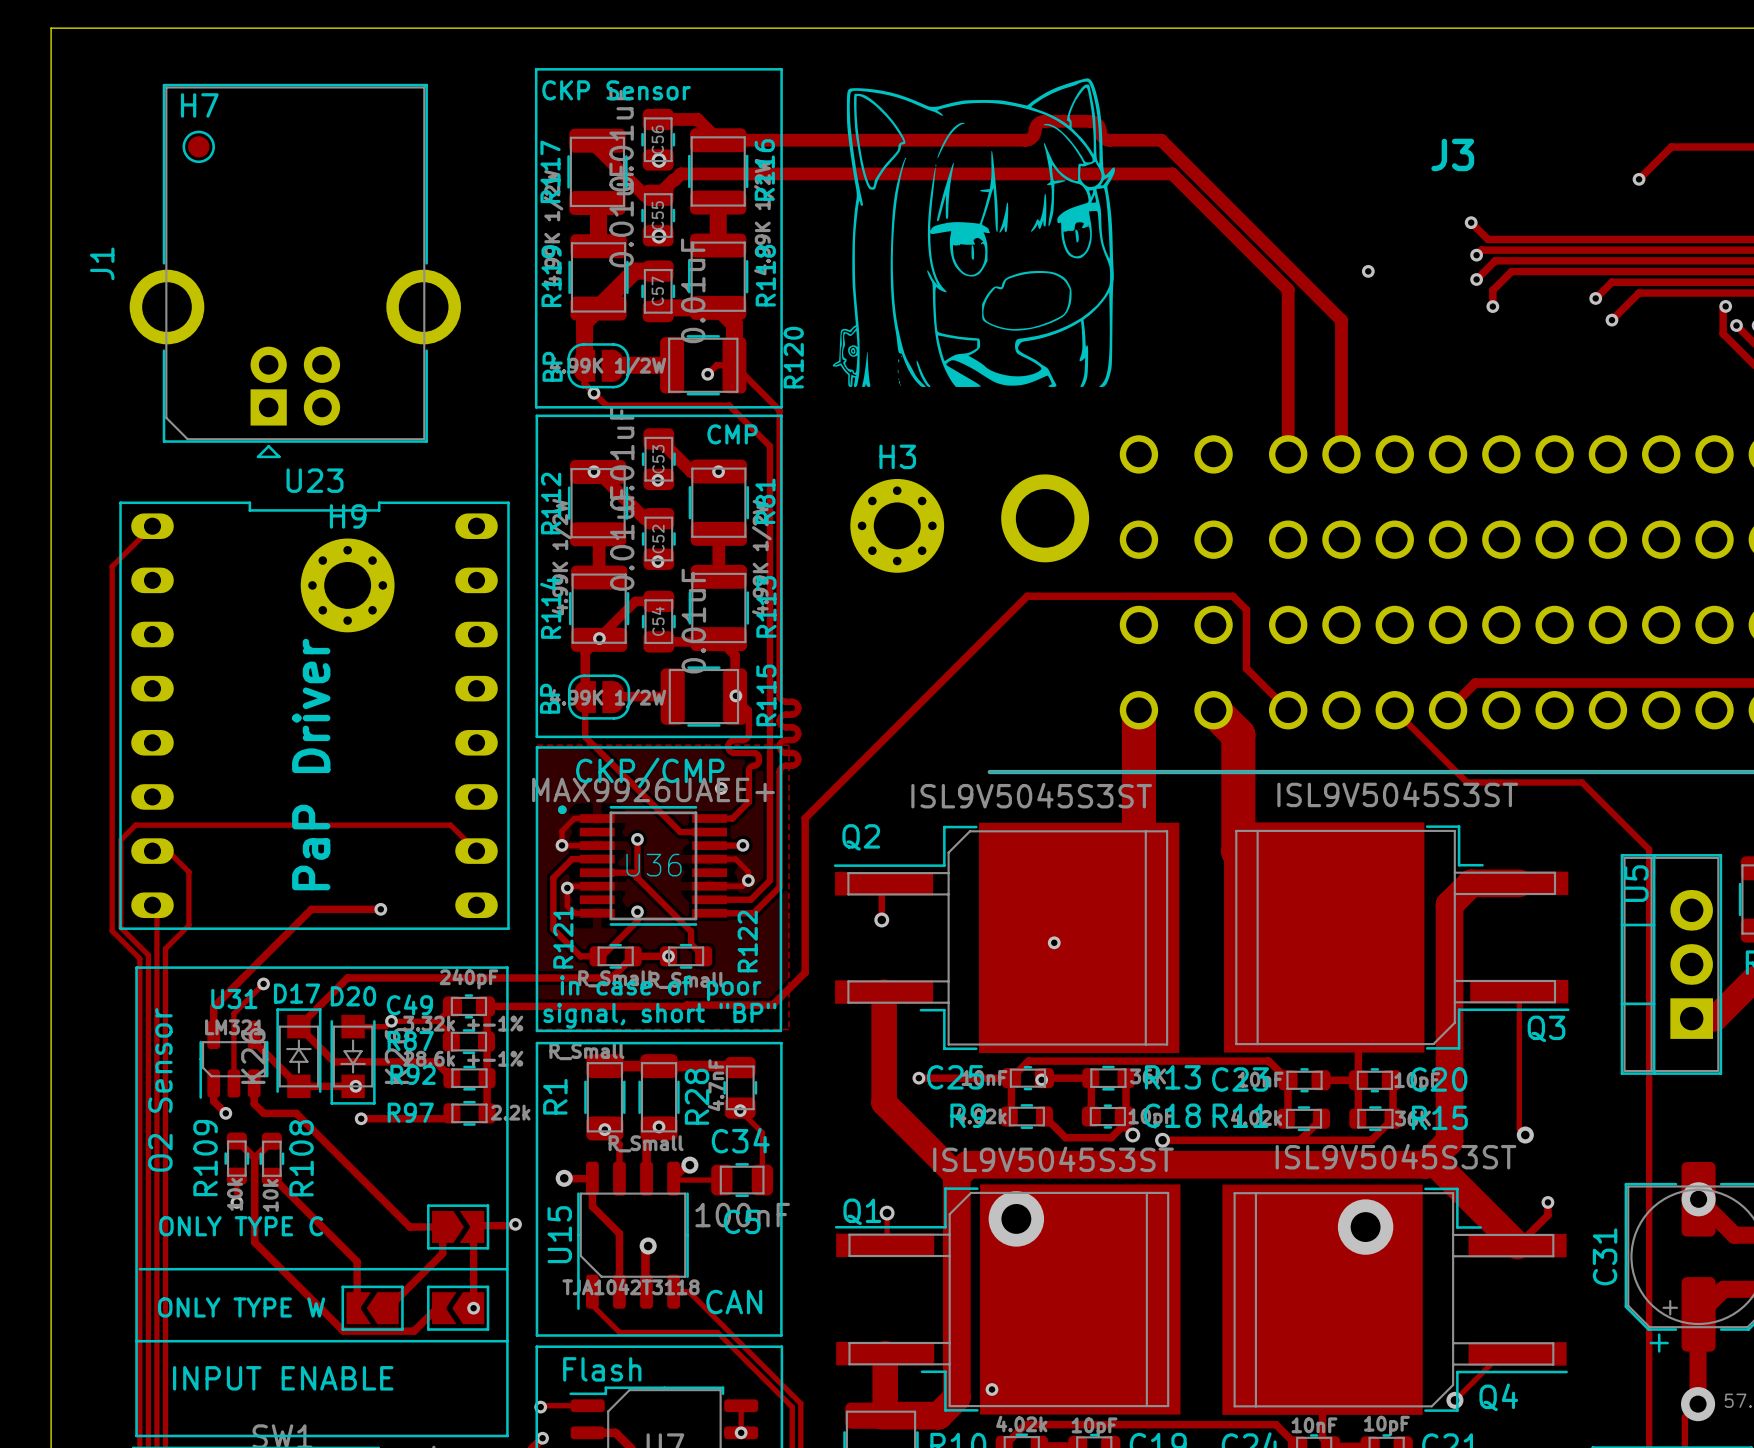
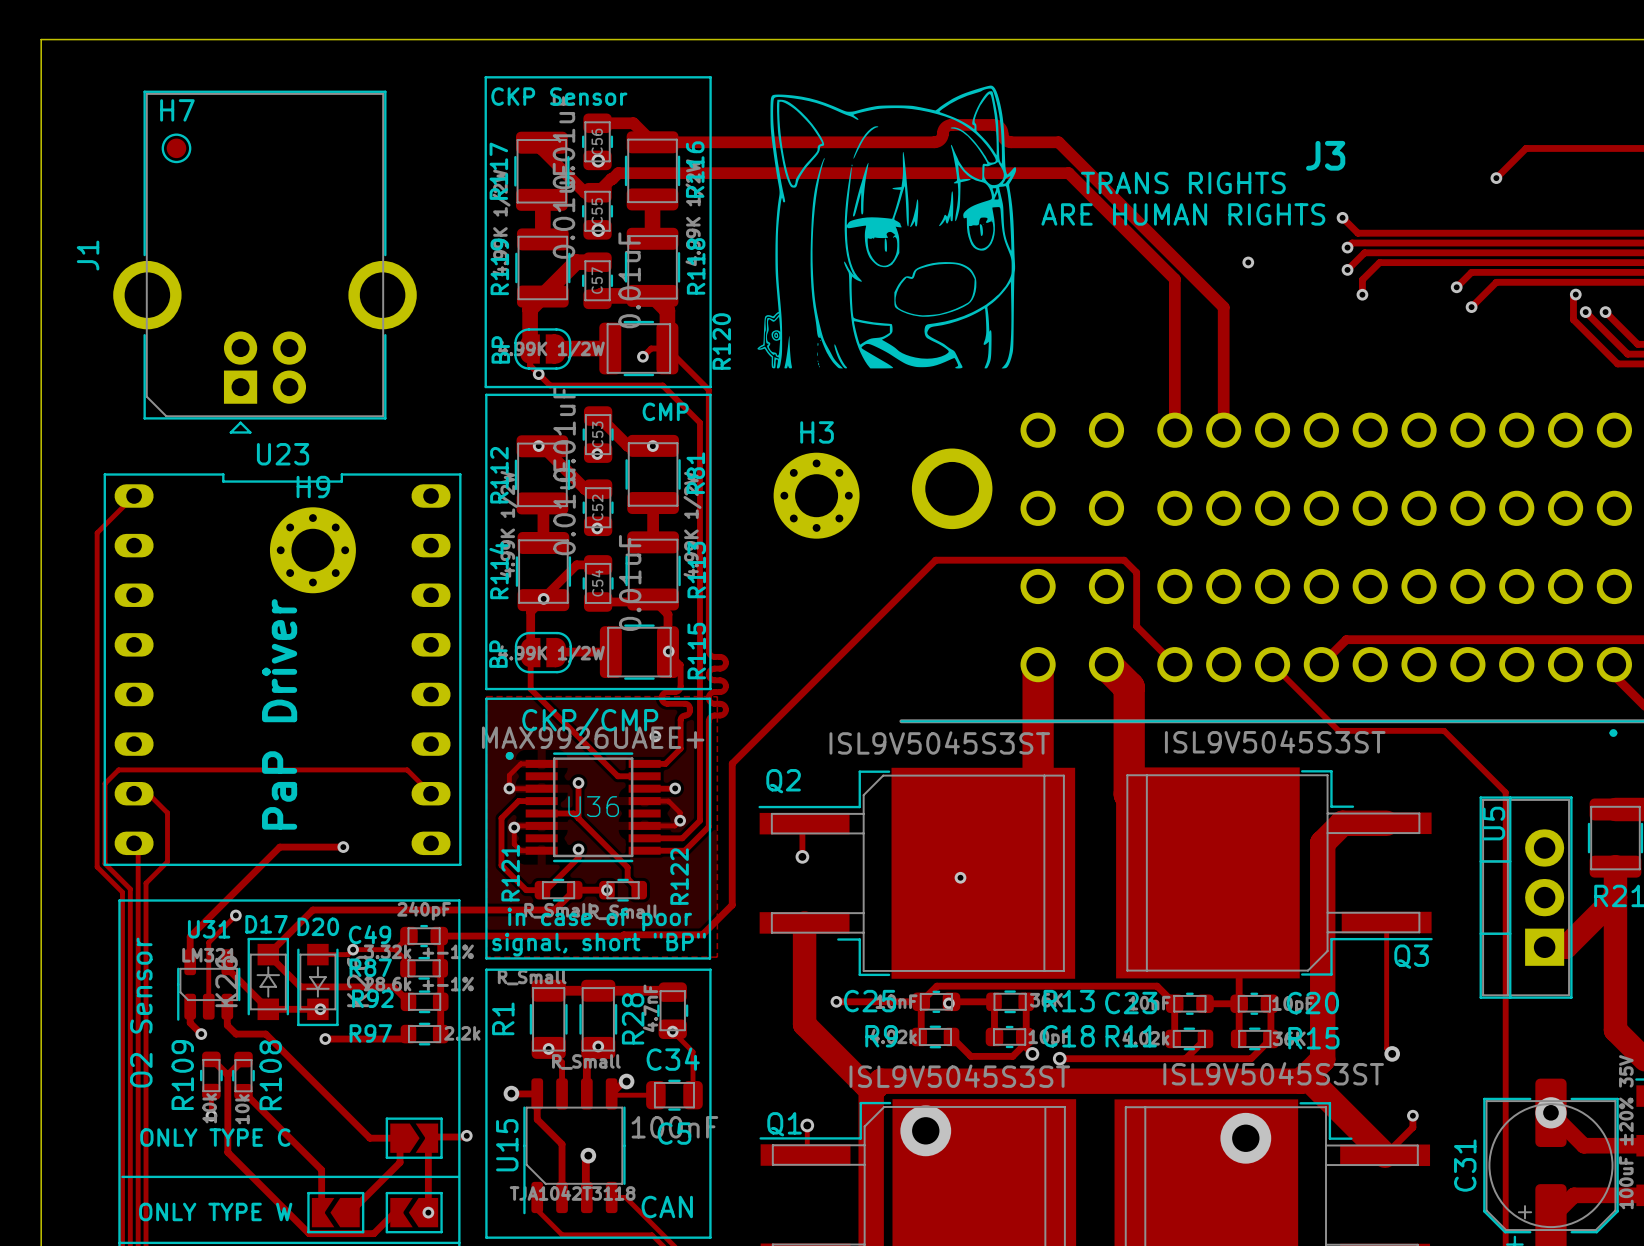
text: none -> TRANS RIGHTS (1183, 183)
text: none -> ARE HUMAN RIGHTS (1183, 214)

